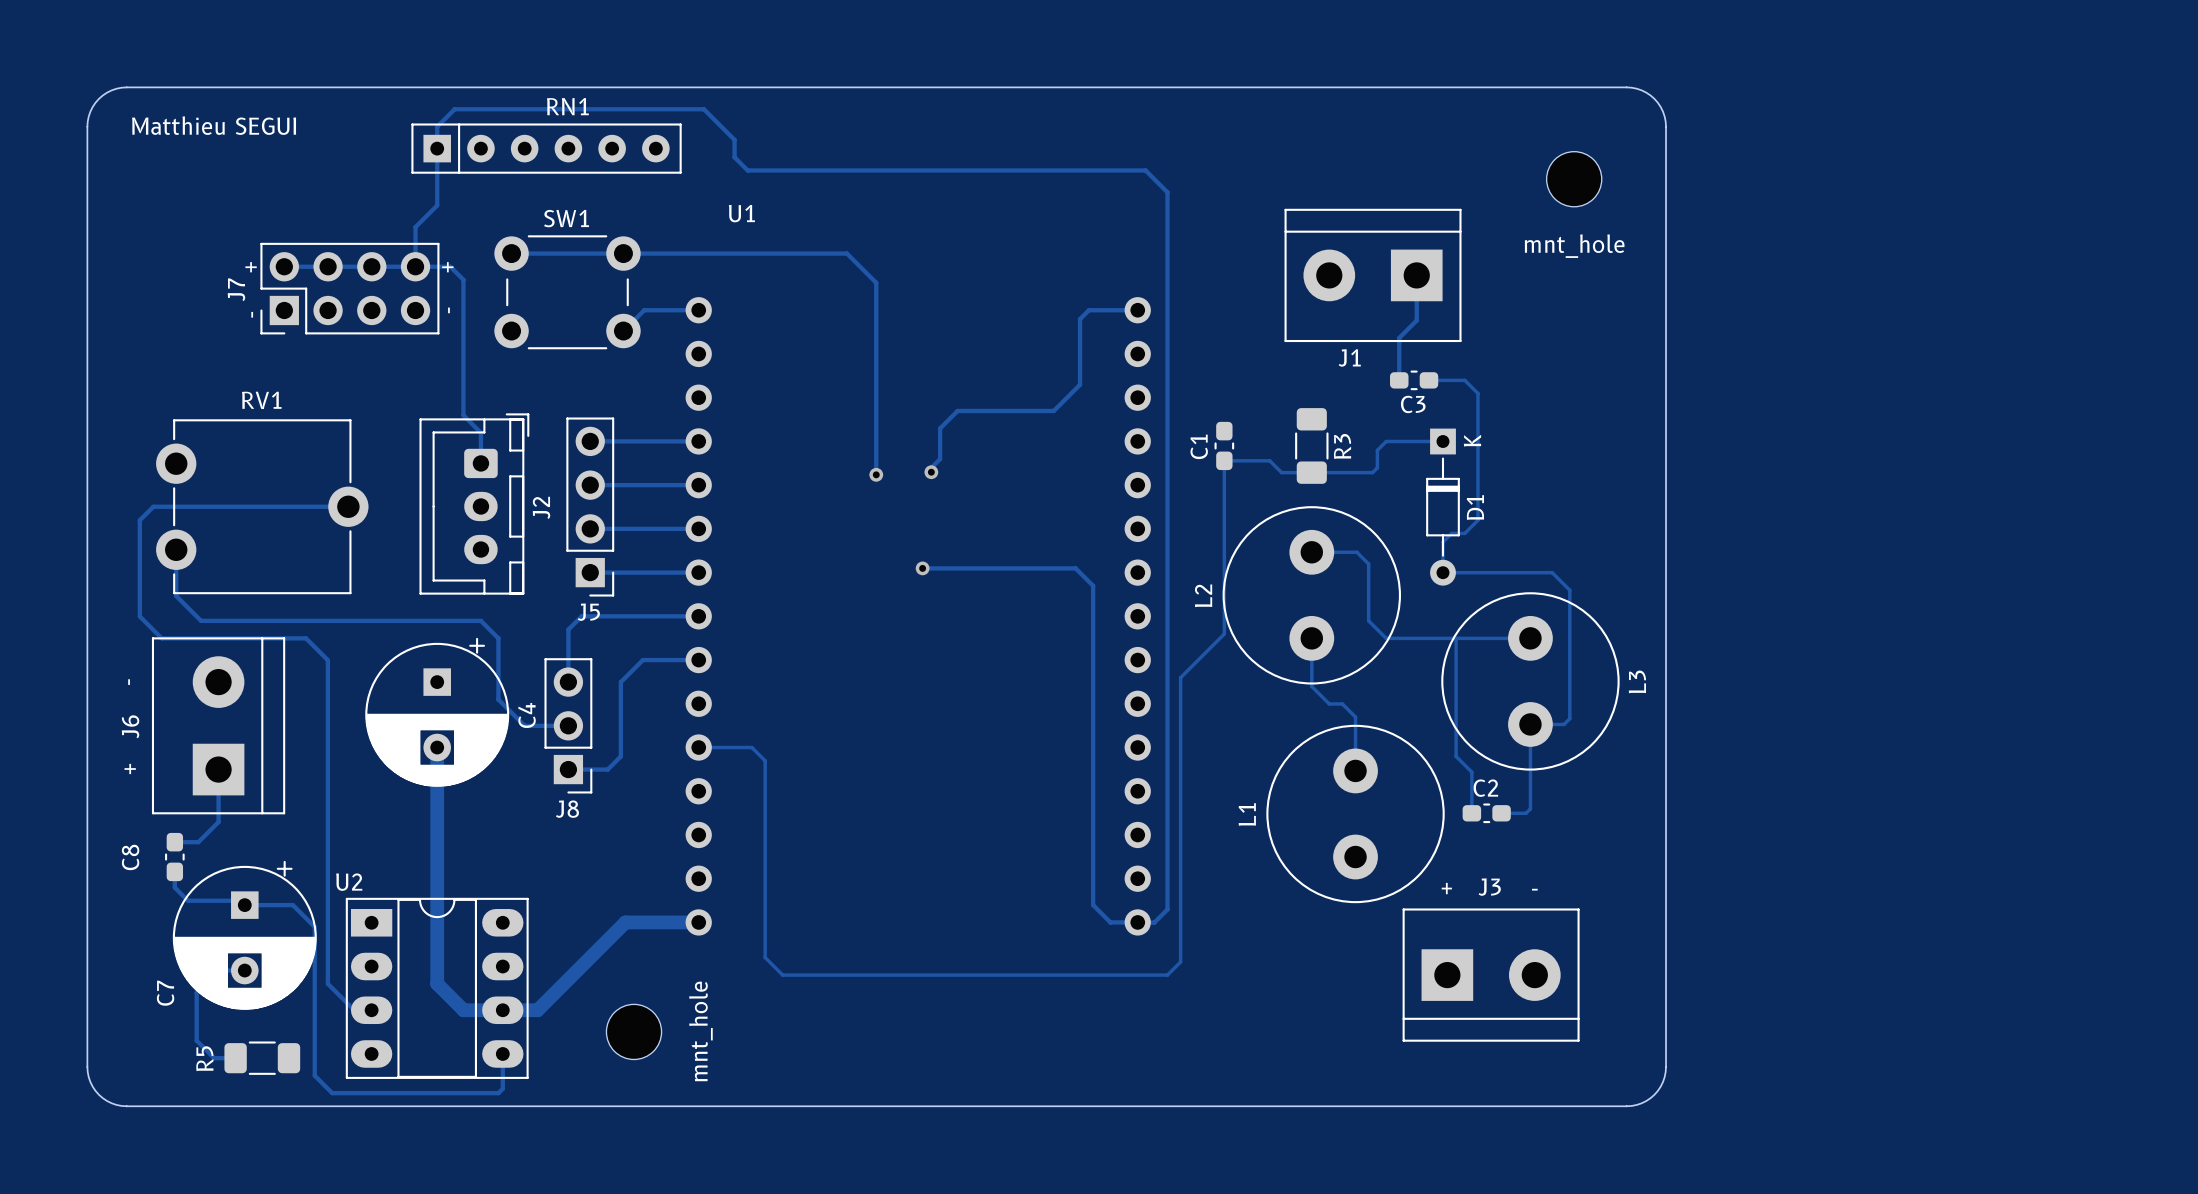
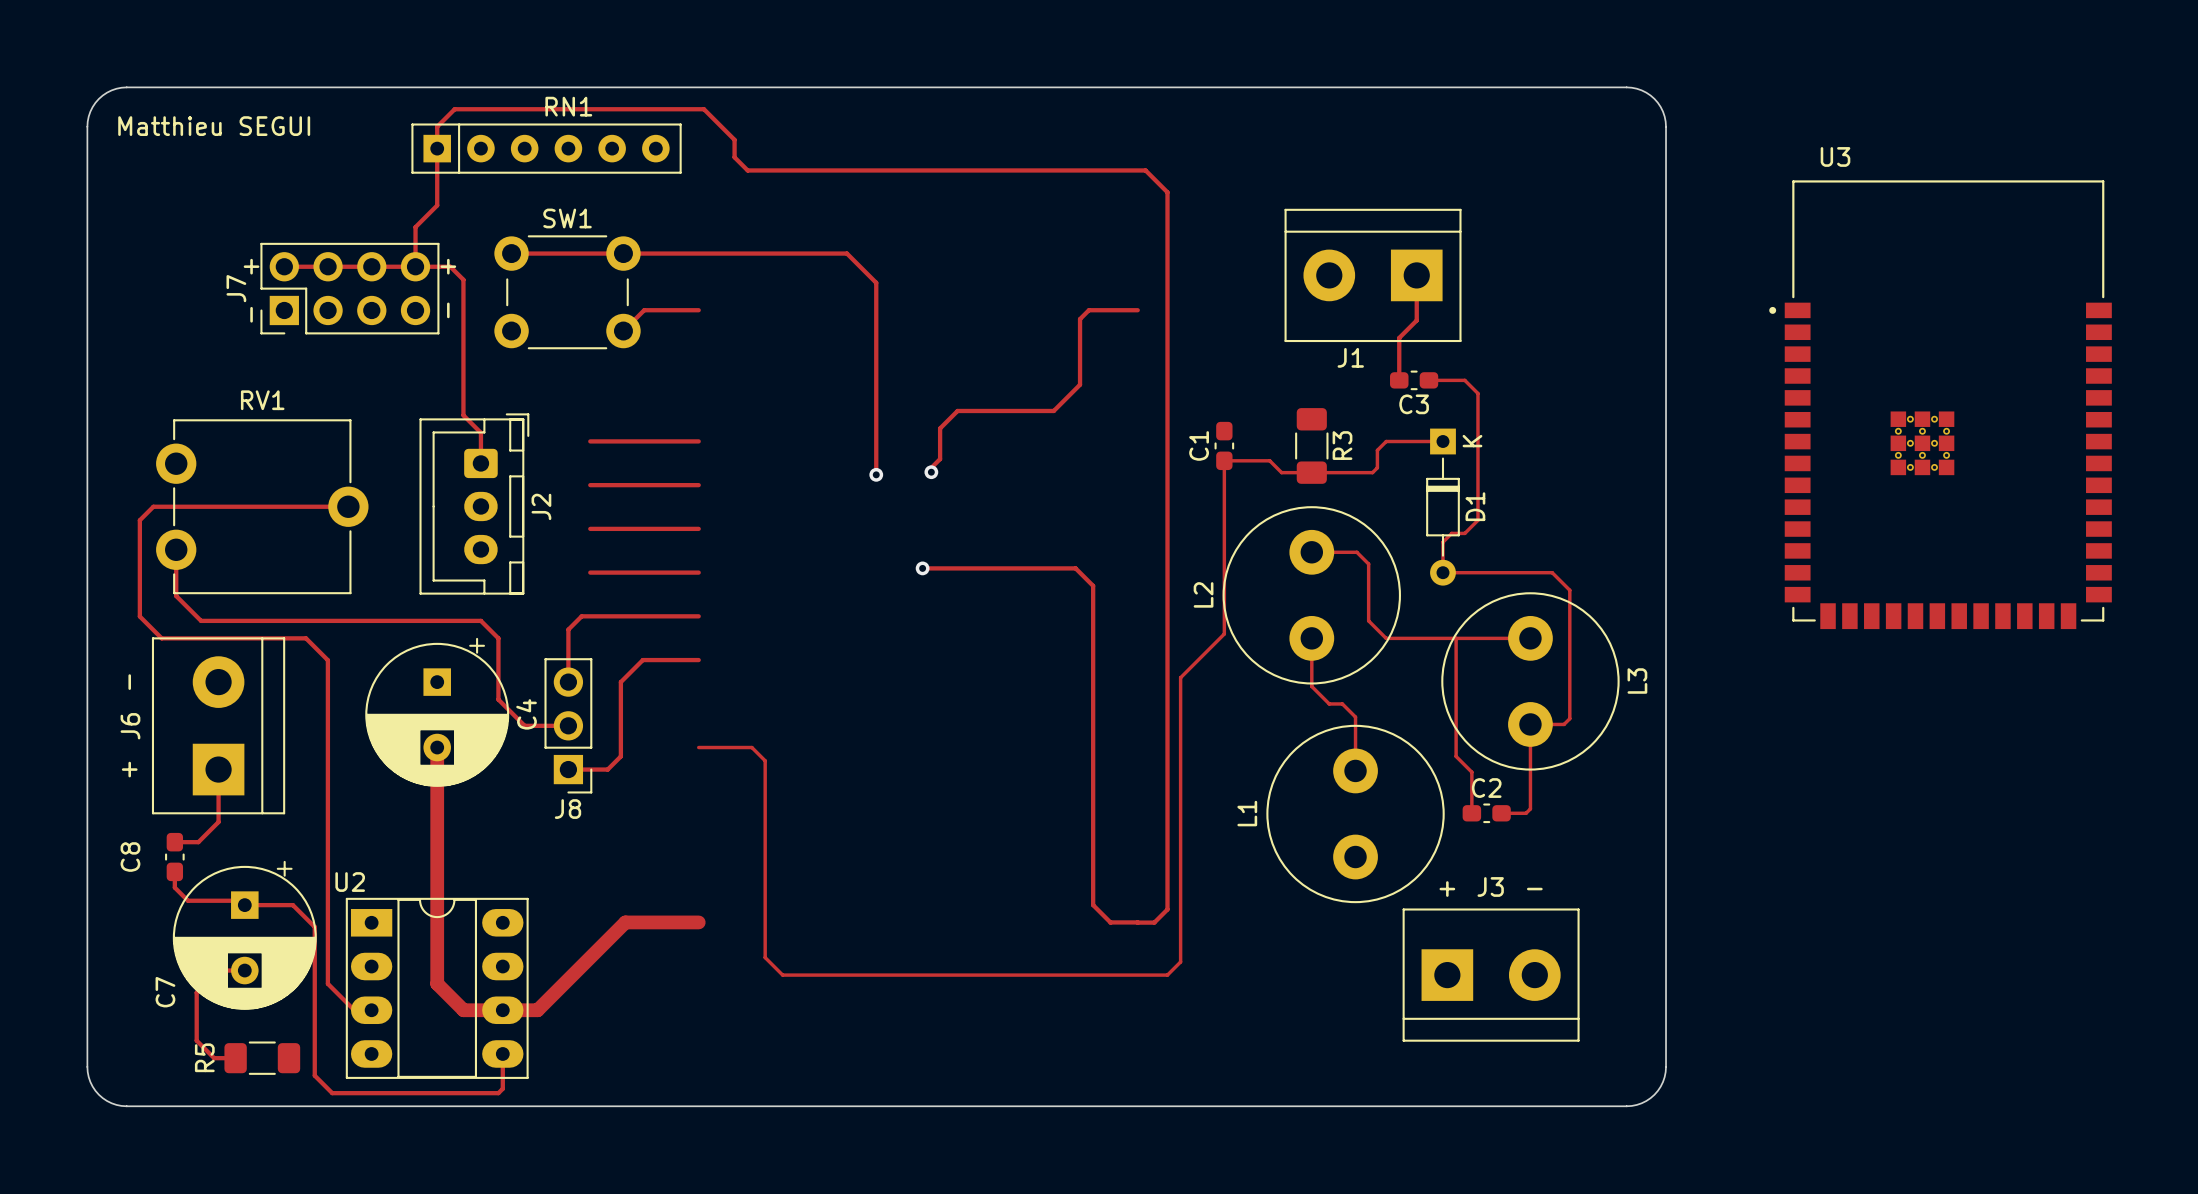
mnt_hole: (1574, 179) -> none
U3: none -> (1940, 404)
J5: (590, 507) -> none
U1: (918, 616) -> none
mnt_hole: (634, 1031) -> none

